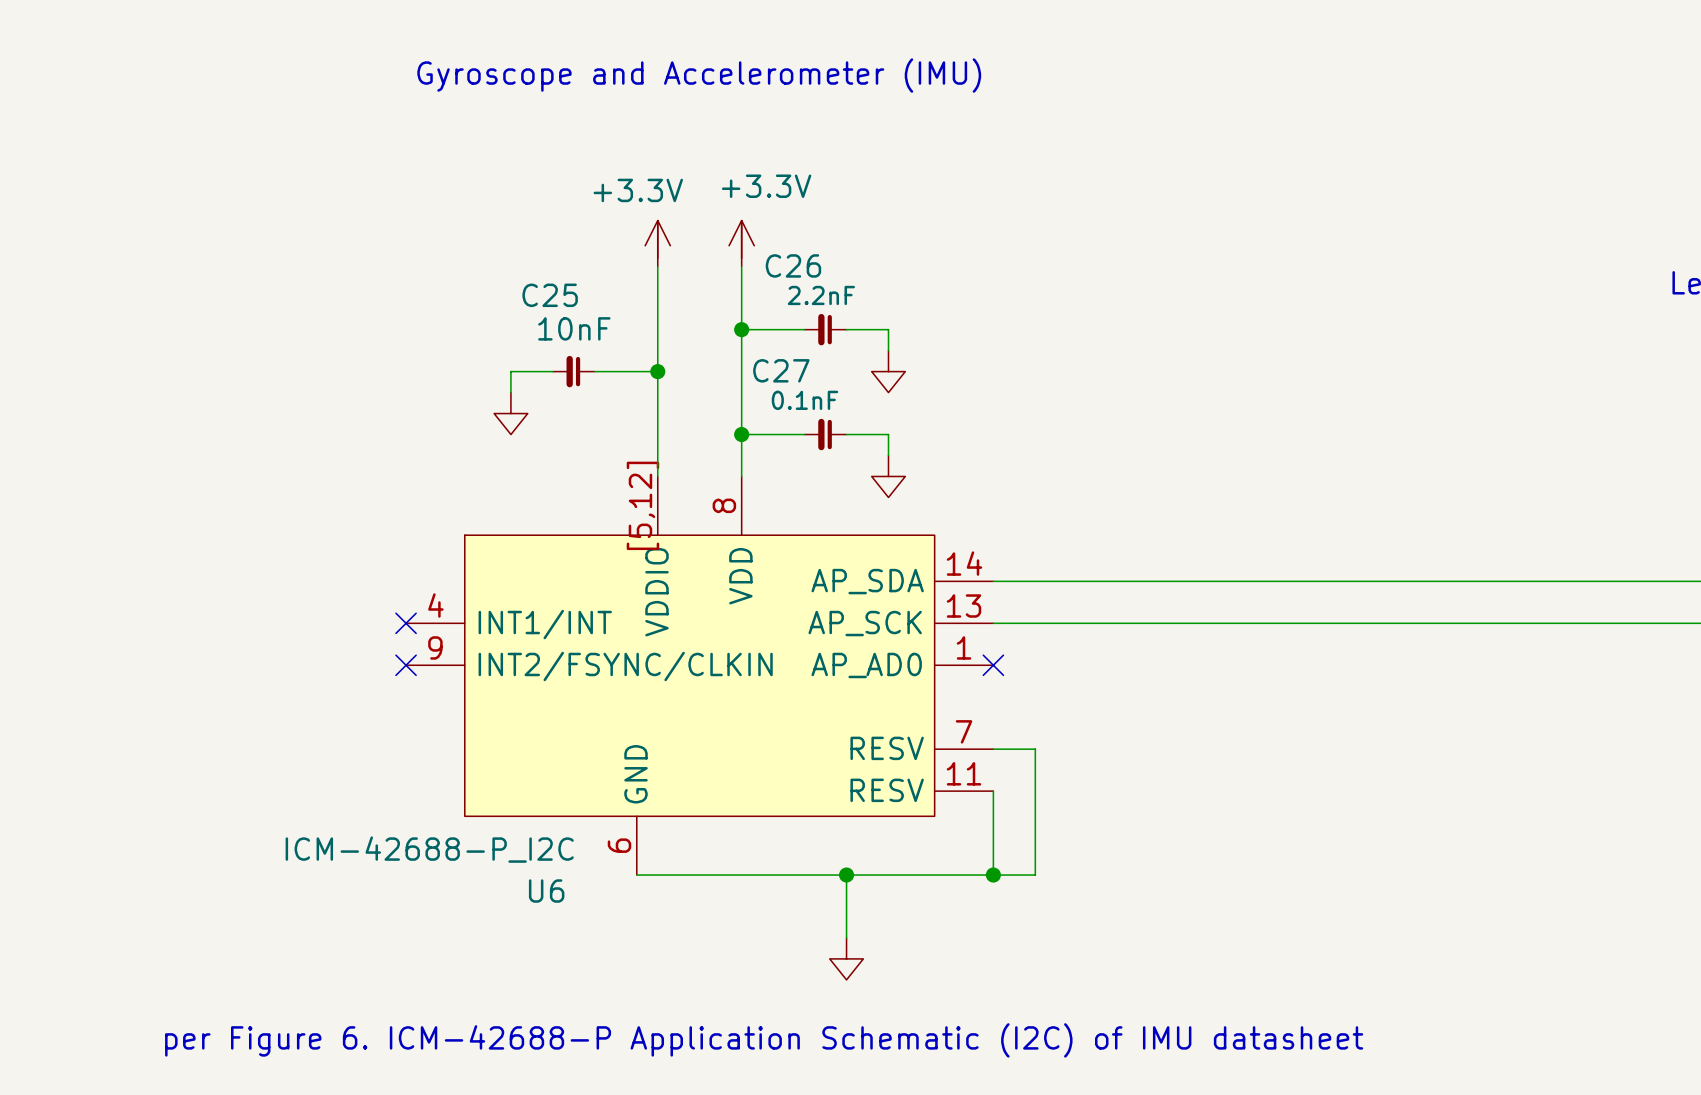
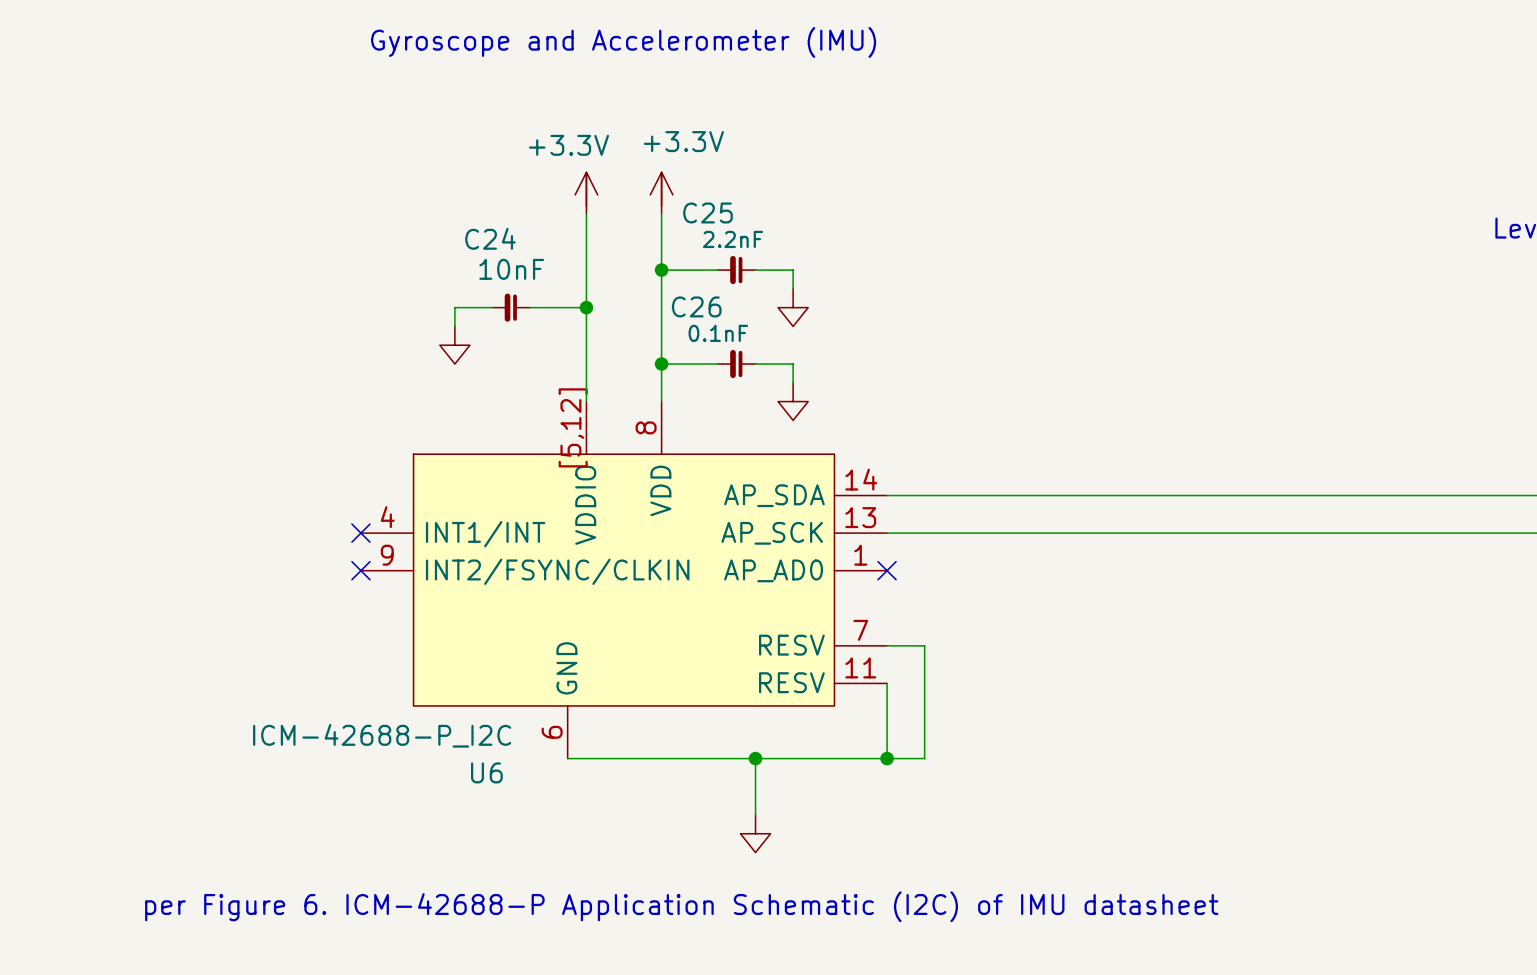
C26 name: C26 (793, 265) -> C25 (707, 212)
C25 name: C25 (550, 295) -> C24 (490, 238)
C27 name: C27 (781, 370) -> C26 (696, 306)

